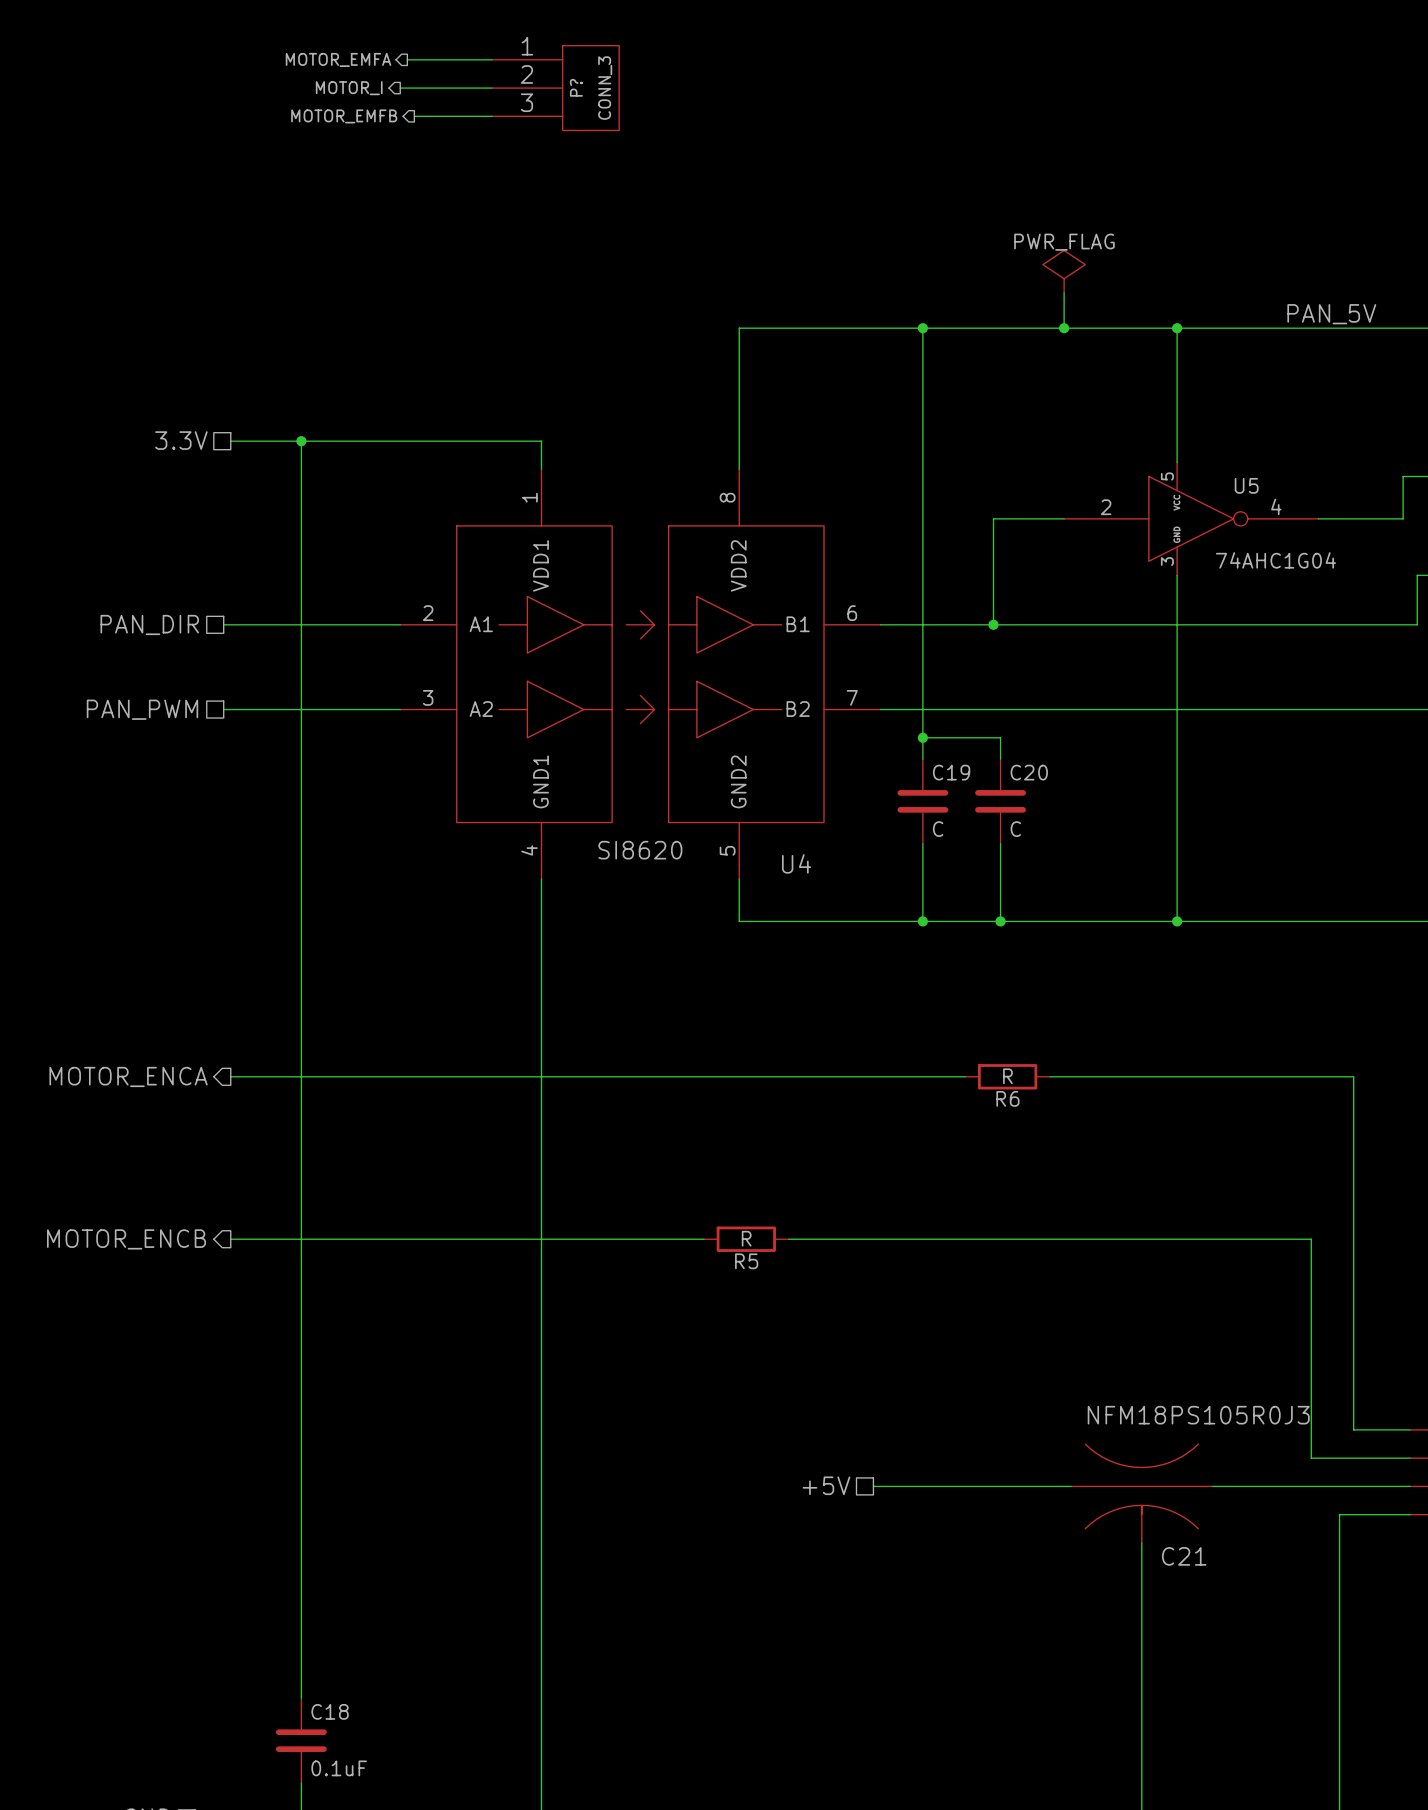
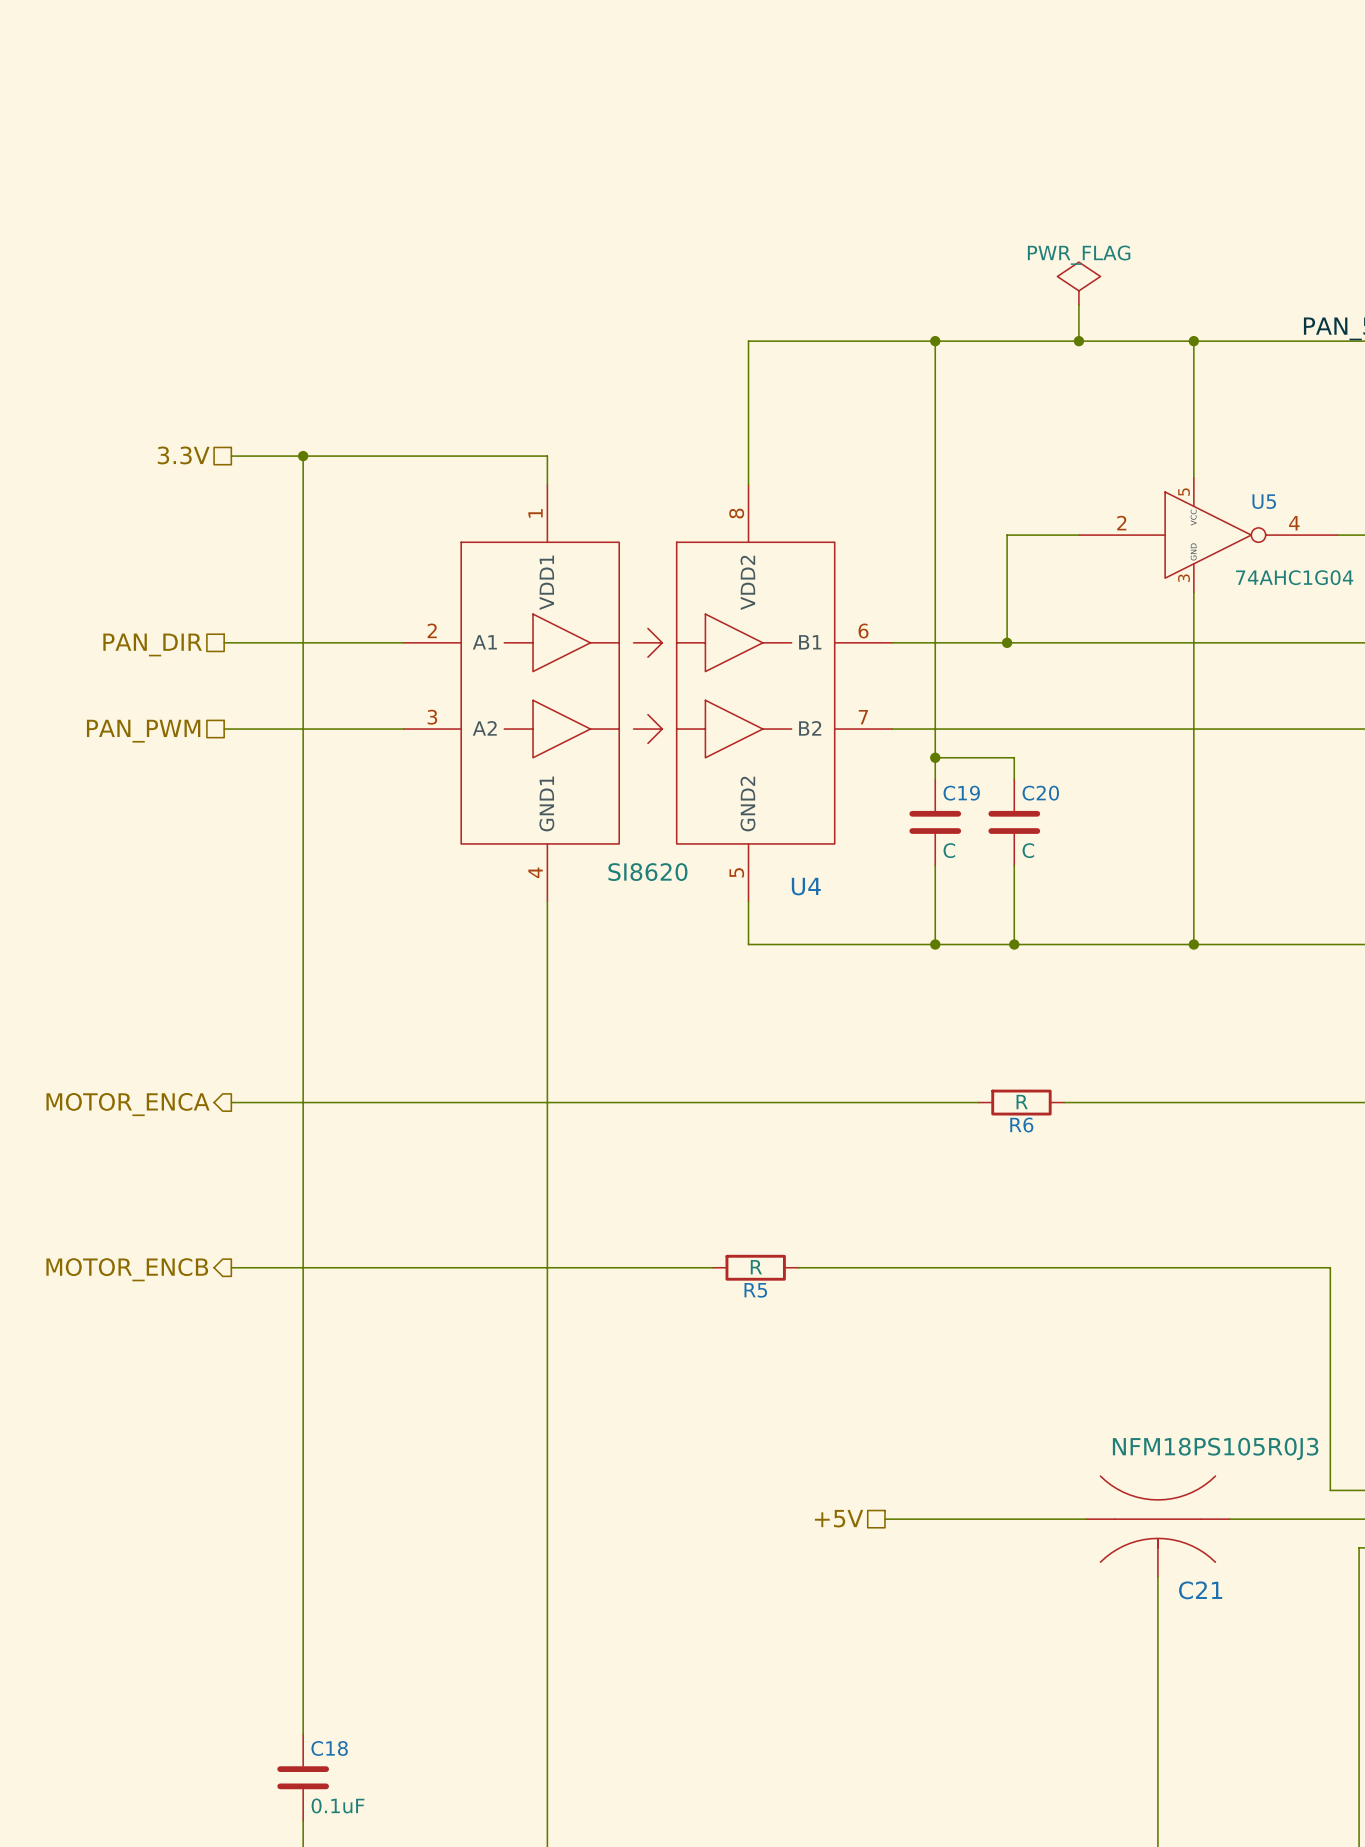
hierarchical label: MOTOR_EMFA (338, 59) -> none
wire: (407, 59) (492, 59) -> none
hierarchical label: MOTOR_I (349, 88) -> none
wire: (400, 88) (492, 88) -> none
P?: CONN_3 (555, 88) -> none
hierarchical label: MOTOR_EMFB (344, 116) -> none
wire: (414, 116) (492, 116) -> none

